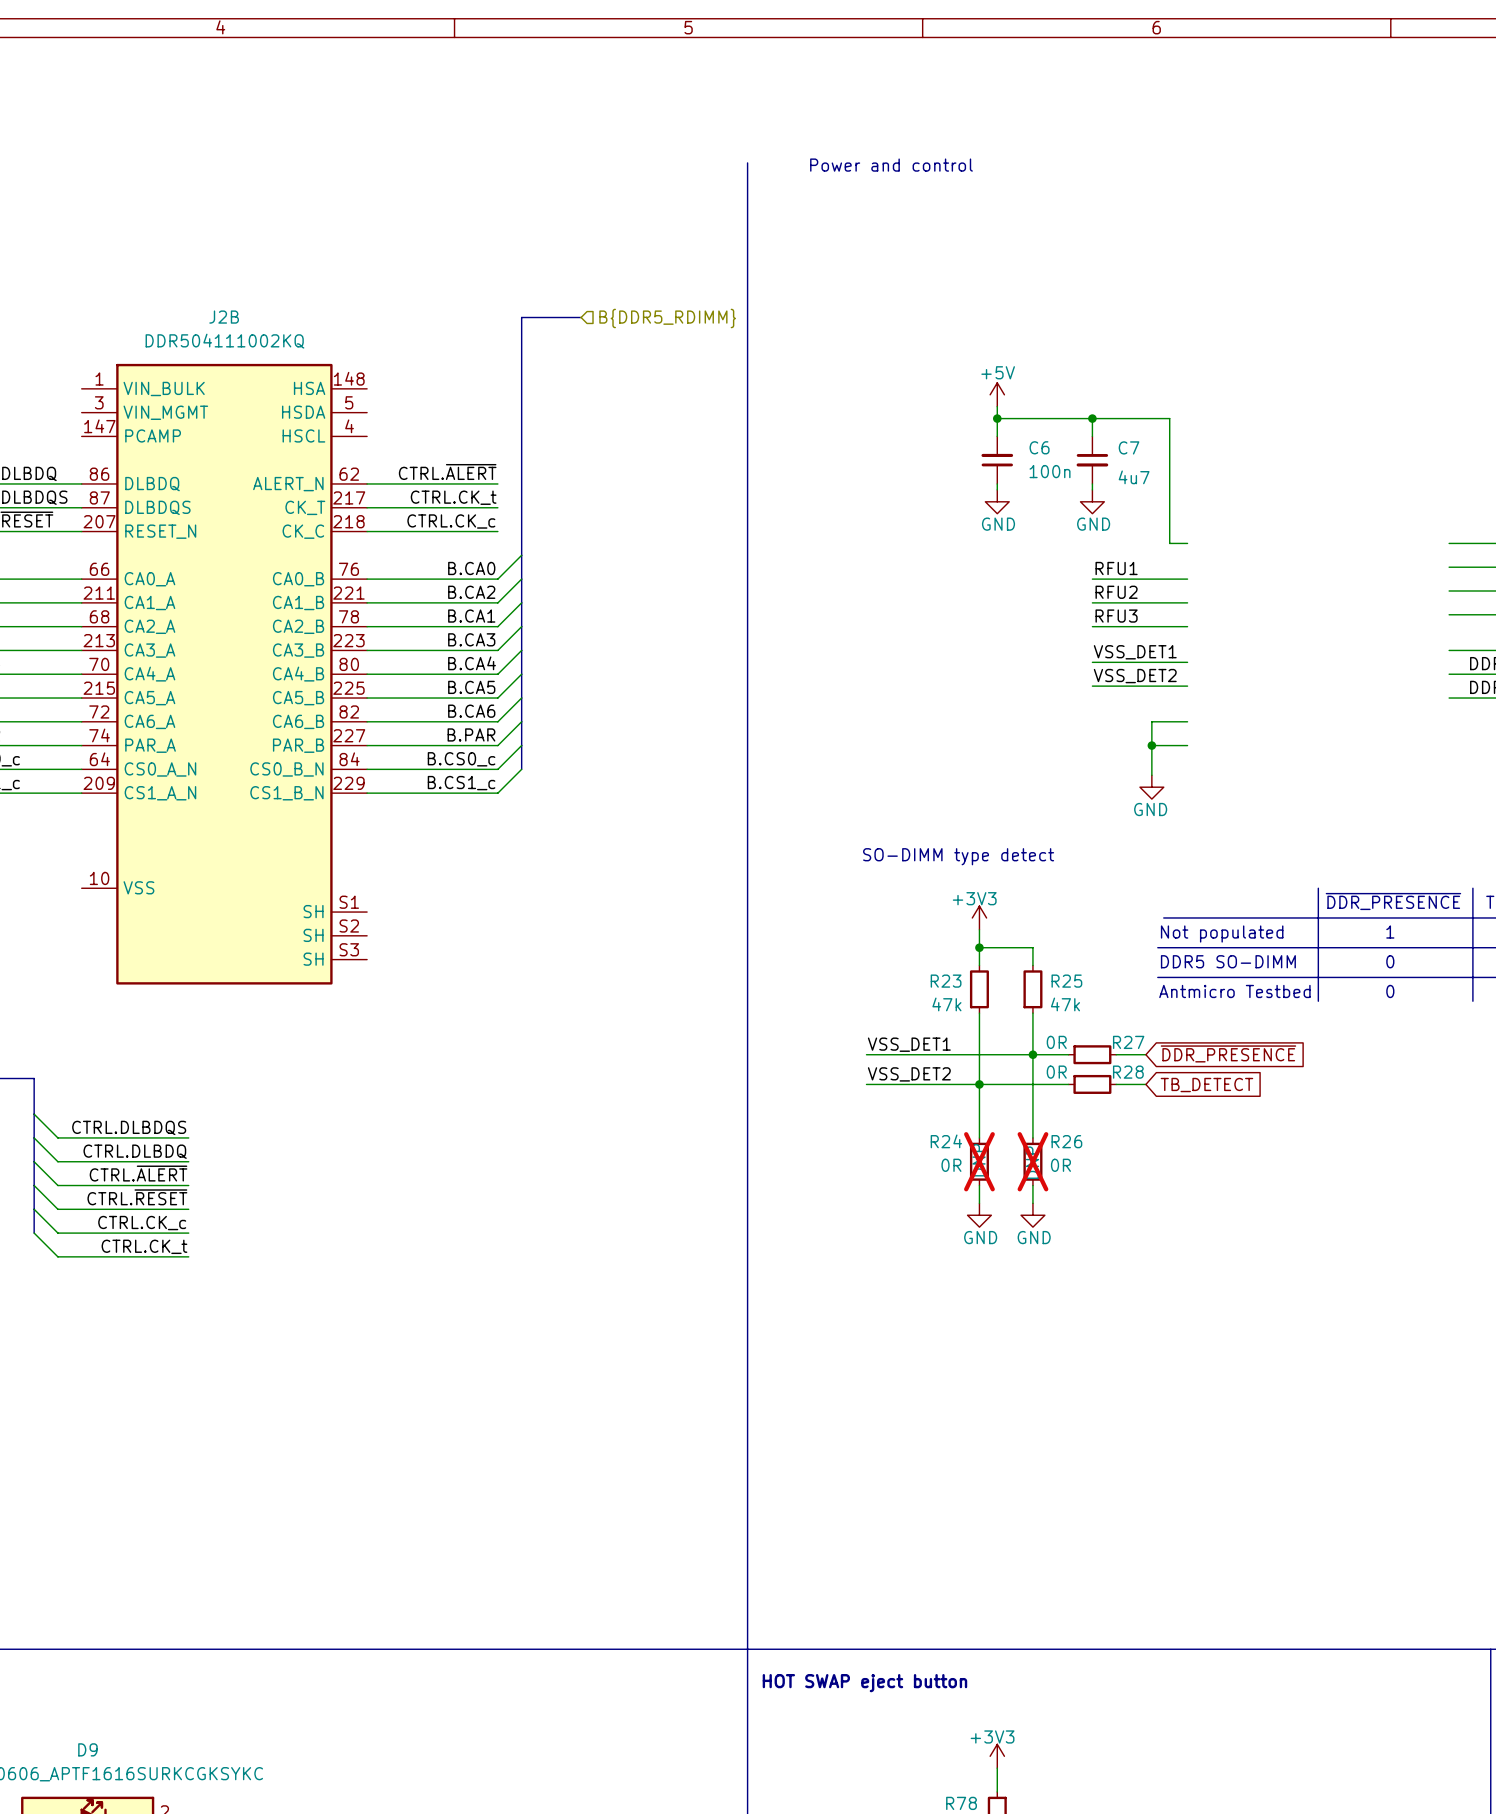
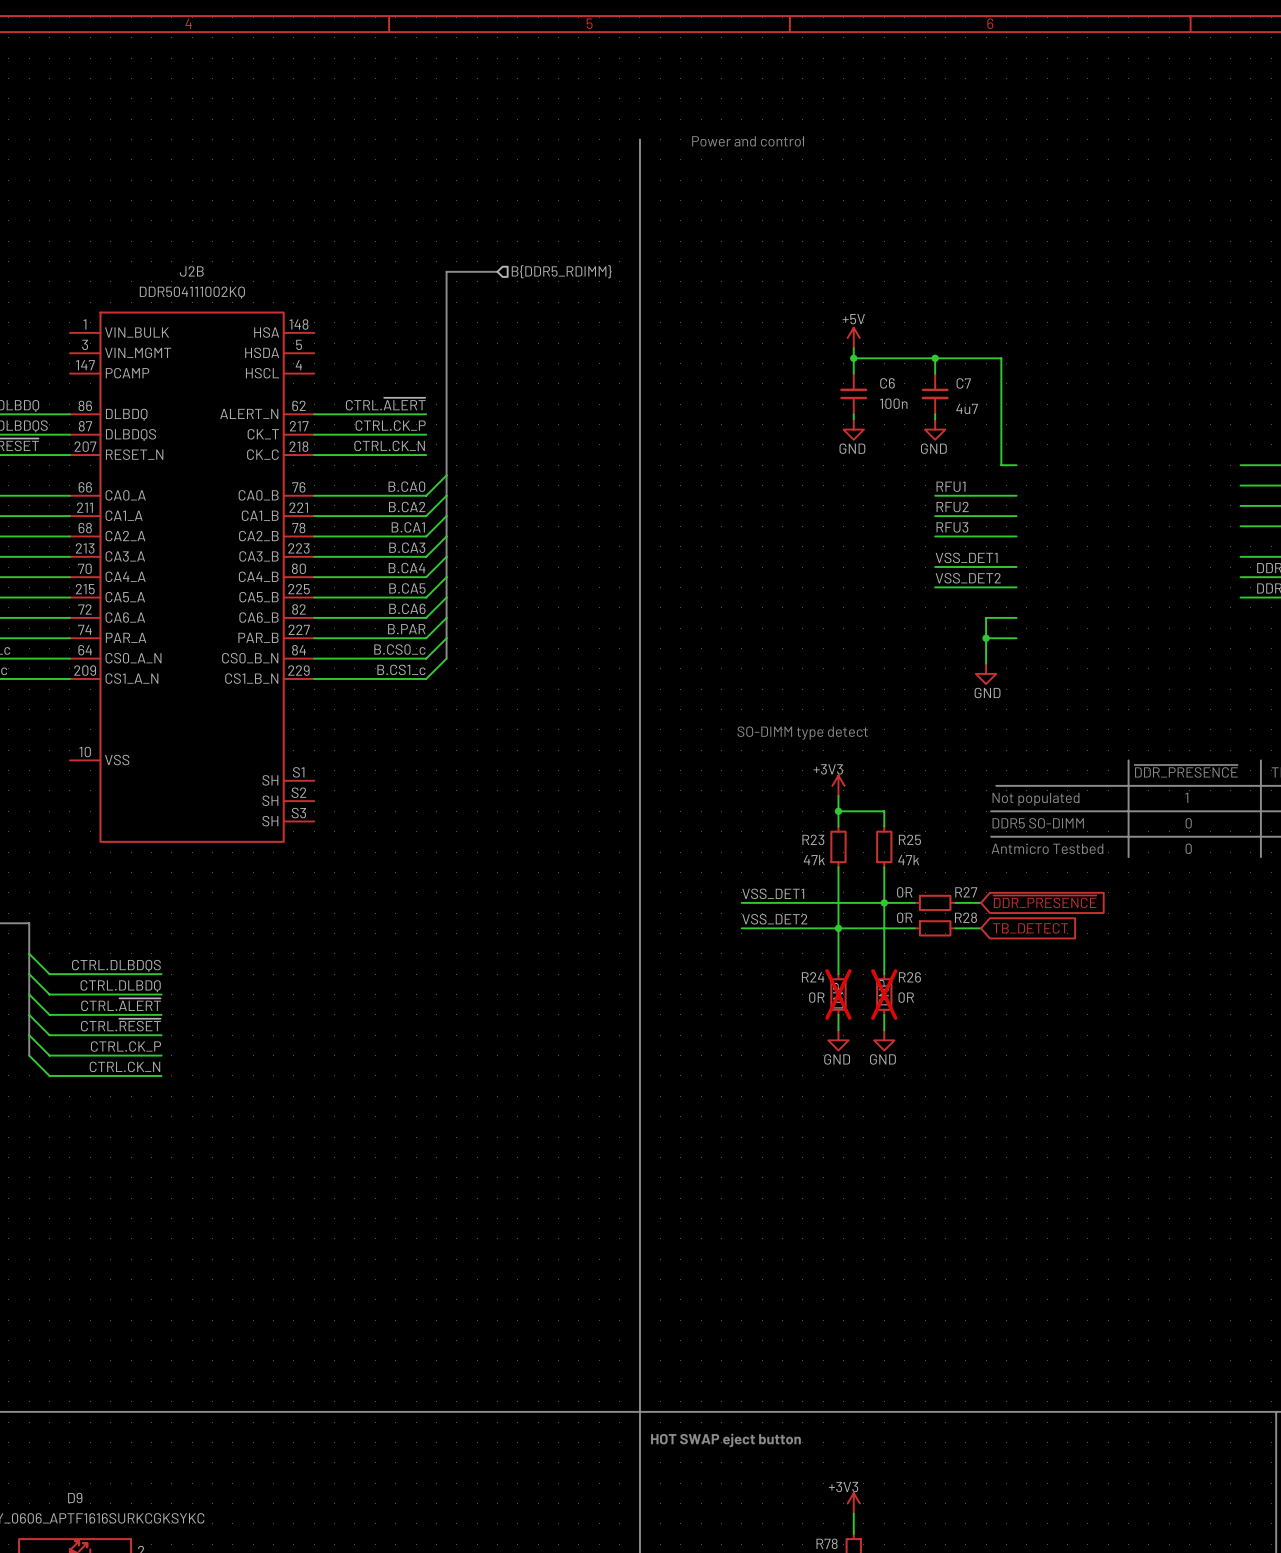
label: CTRL.CK_t (453, 497) -> CTRL.CK_P (390, 425)
label: CTRL.CK_c (451, 521) -> CTRL.CK_N (389, 445)
label: CTRL.CK_c (142, 1223) -> CTRL.CK_P (125, 1046)
label: CTRL.CK_t (144, 1246) -> CTRL.CK_N (124, 1066)

